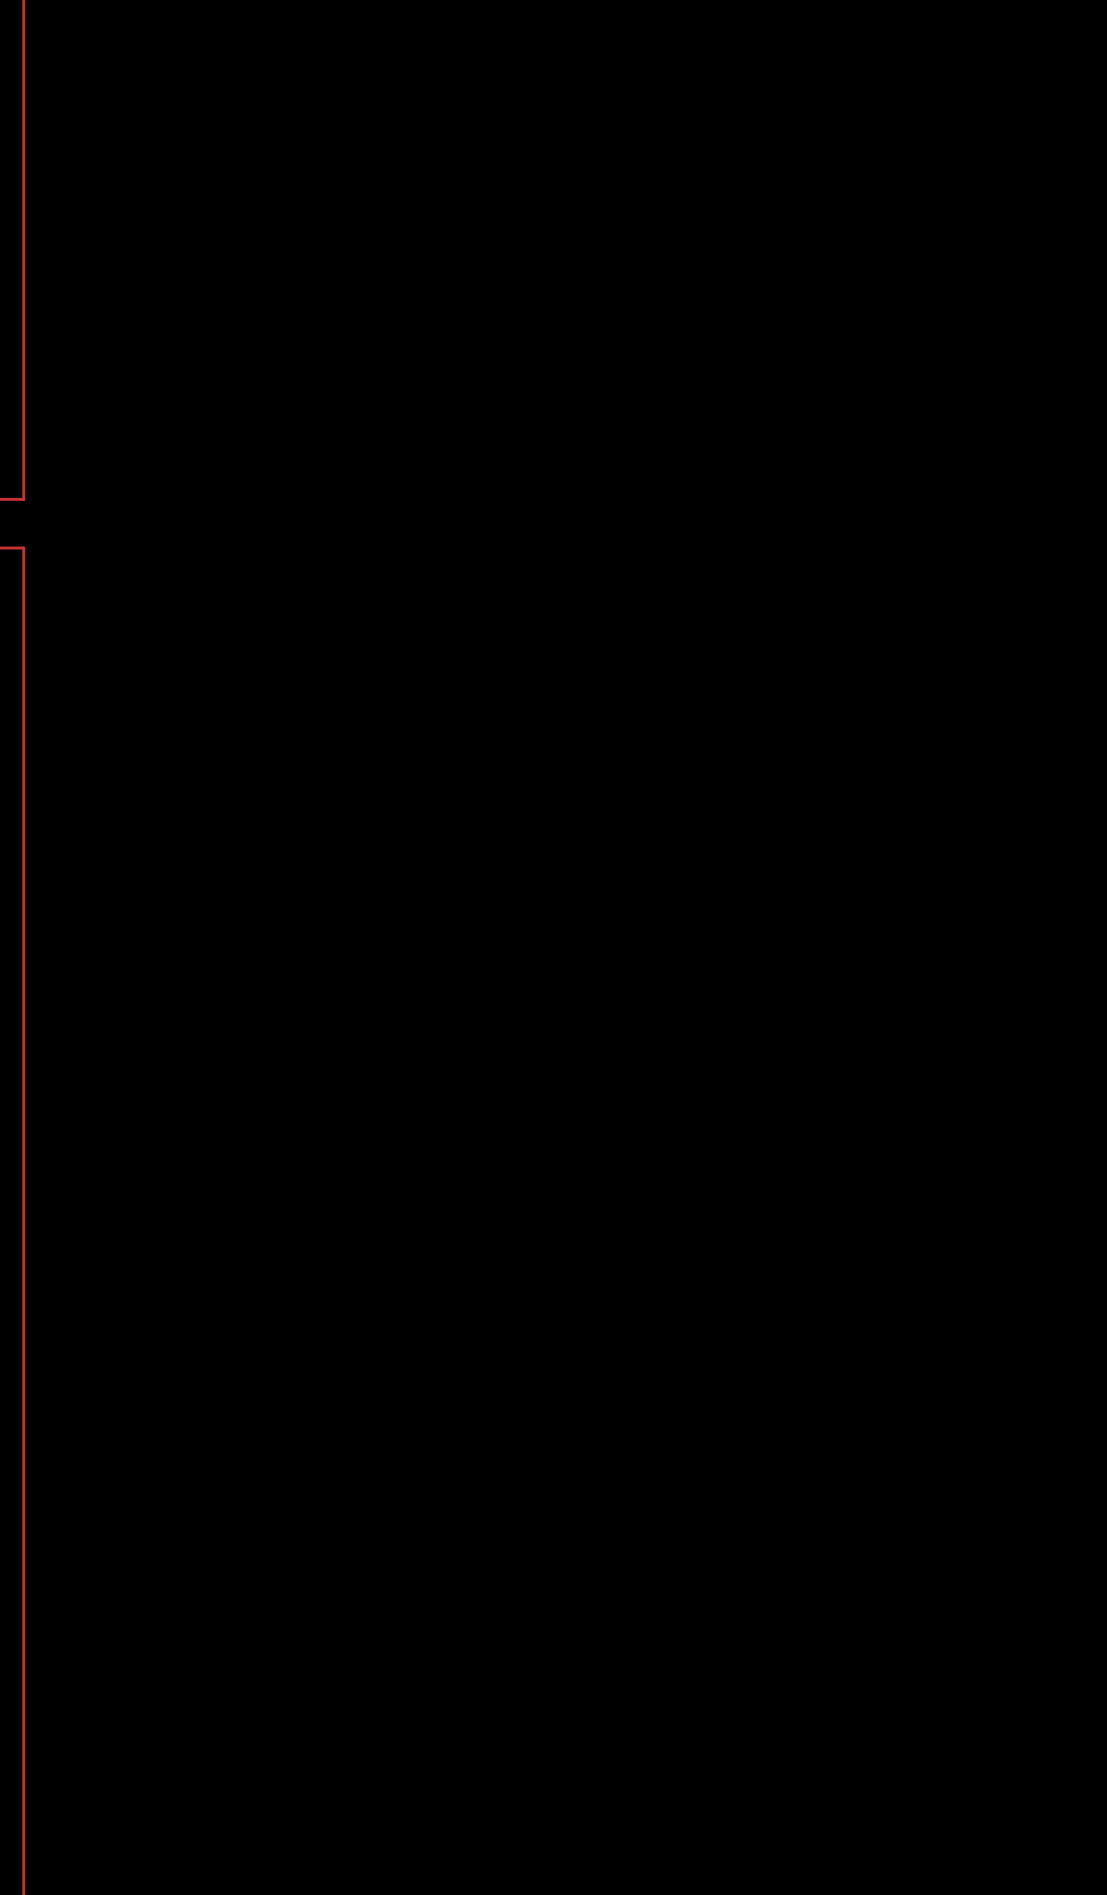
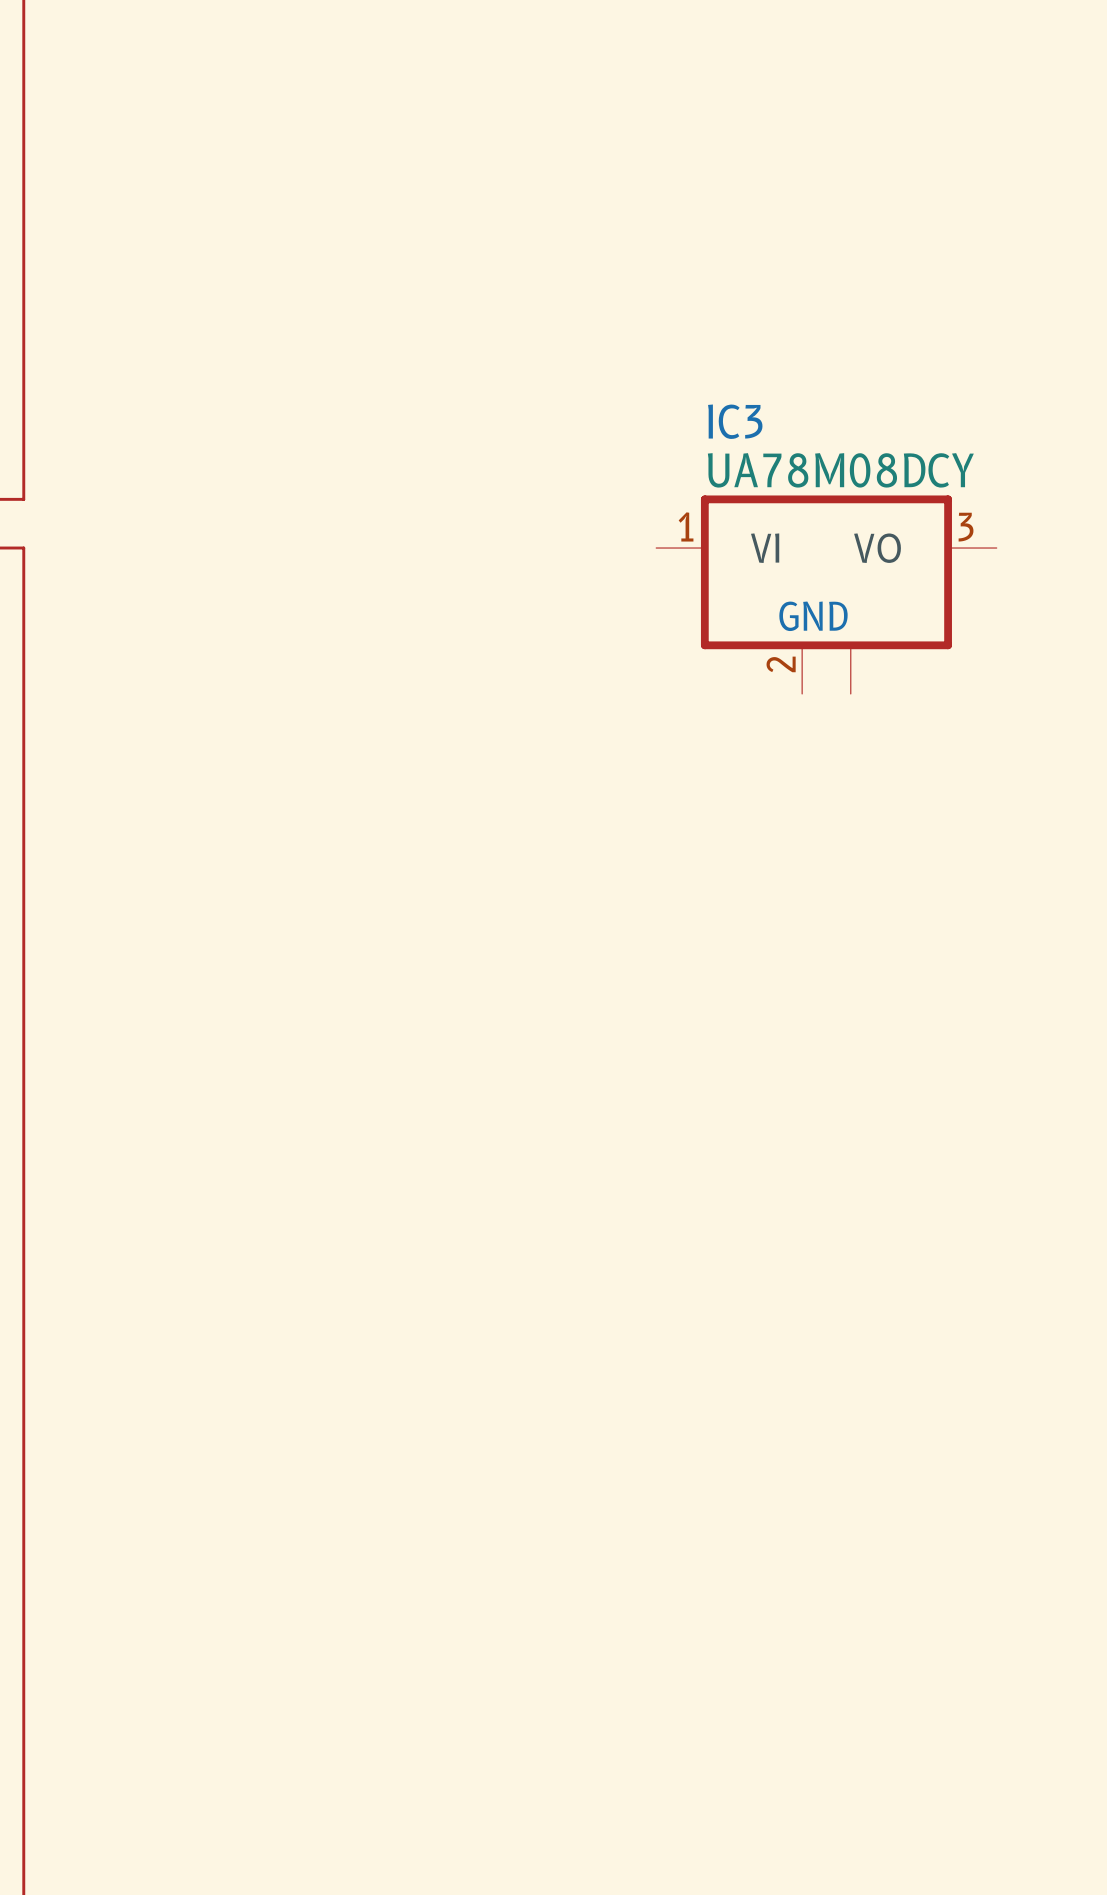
IC3: none -> UA78M08DCY (826, 594)

